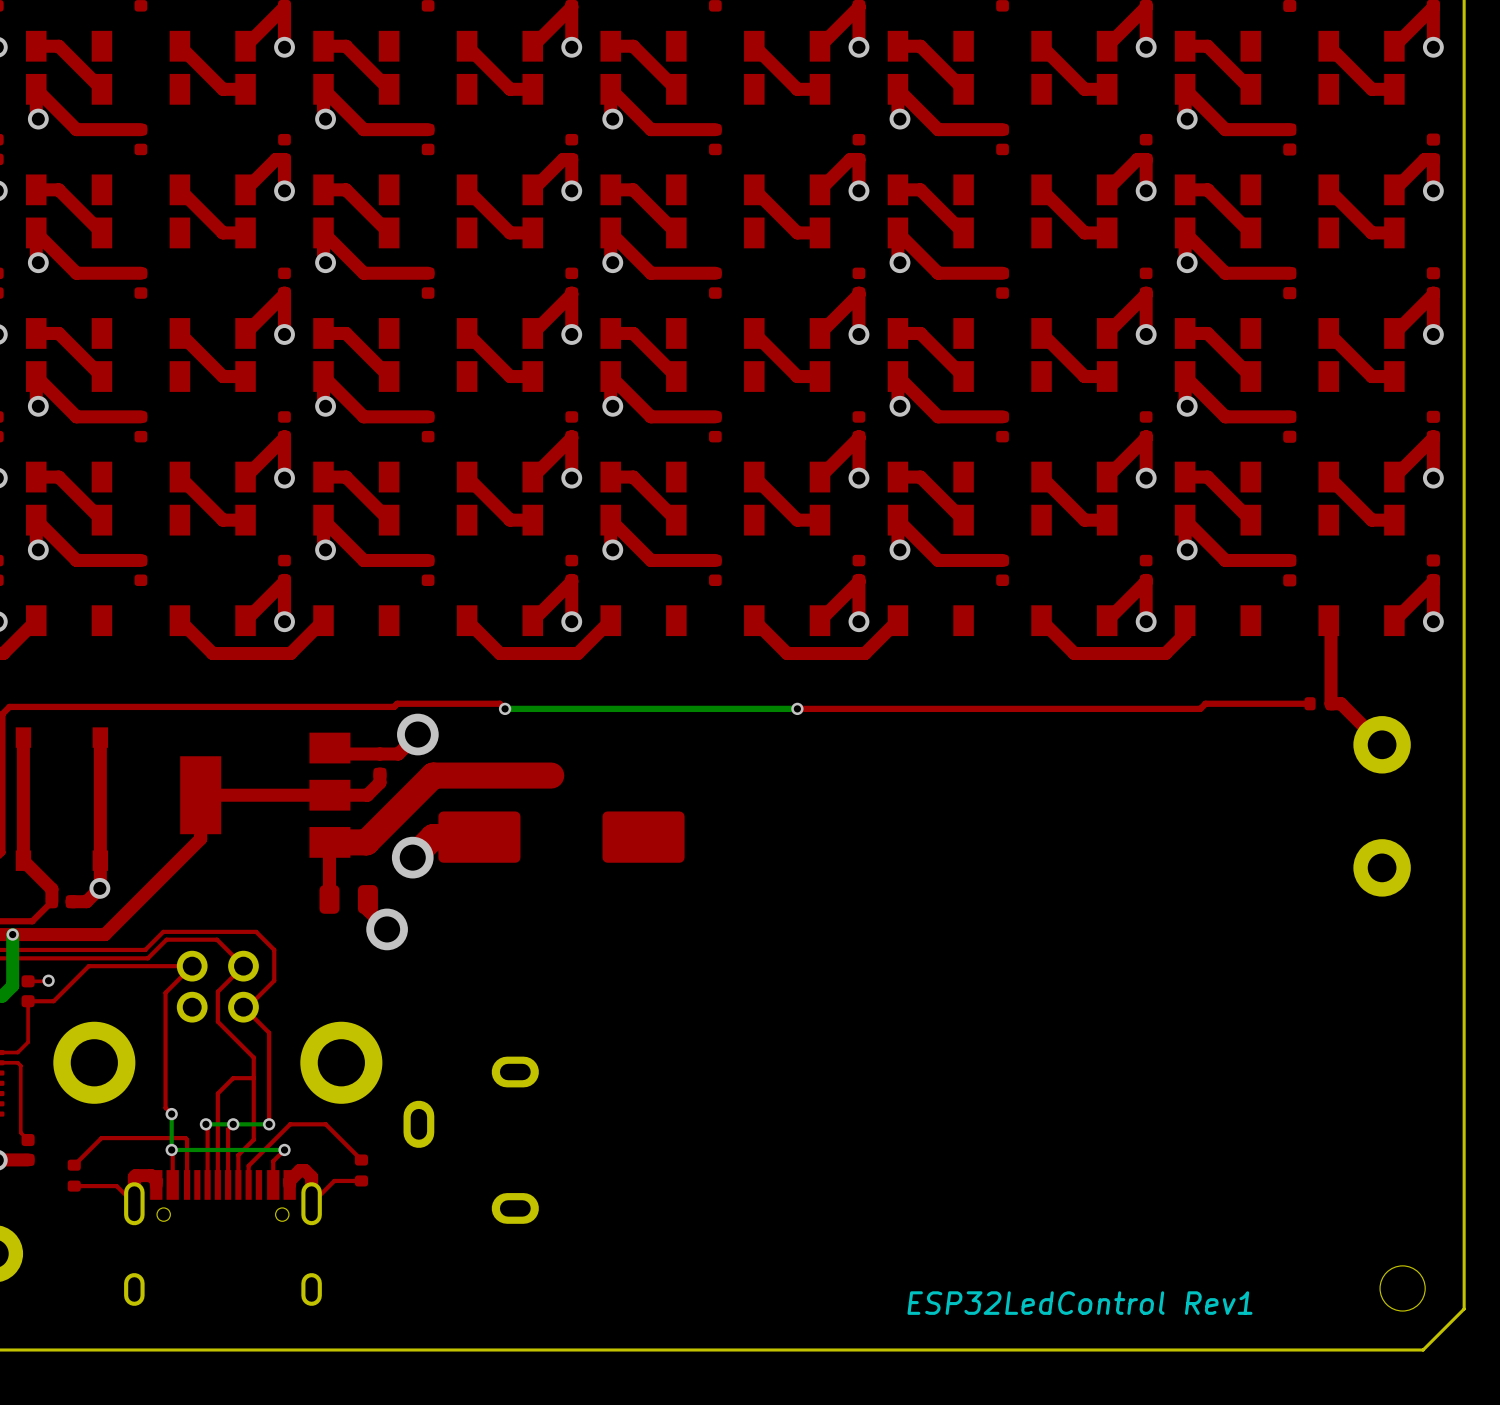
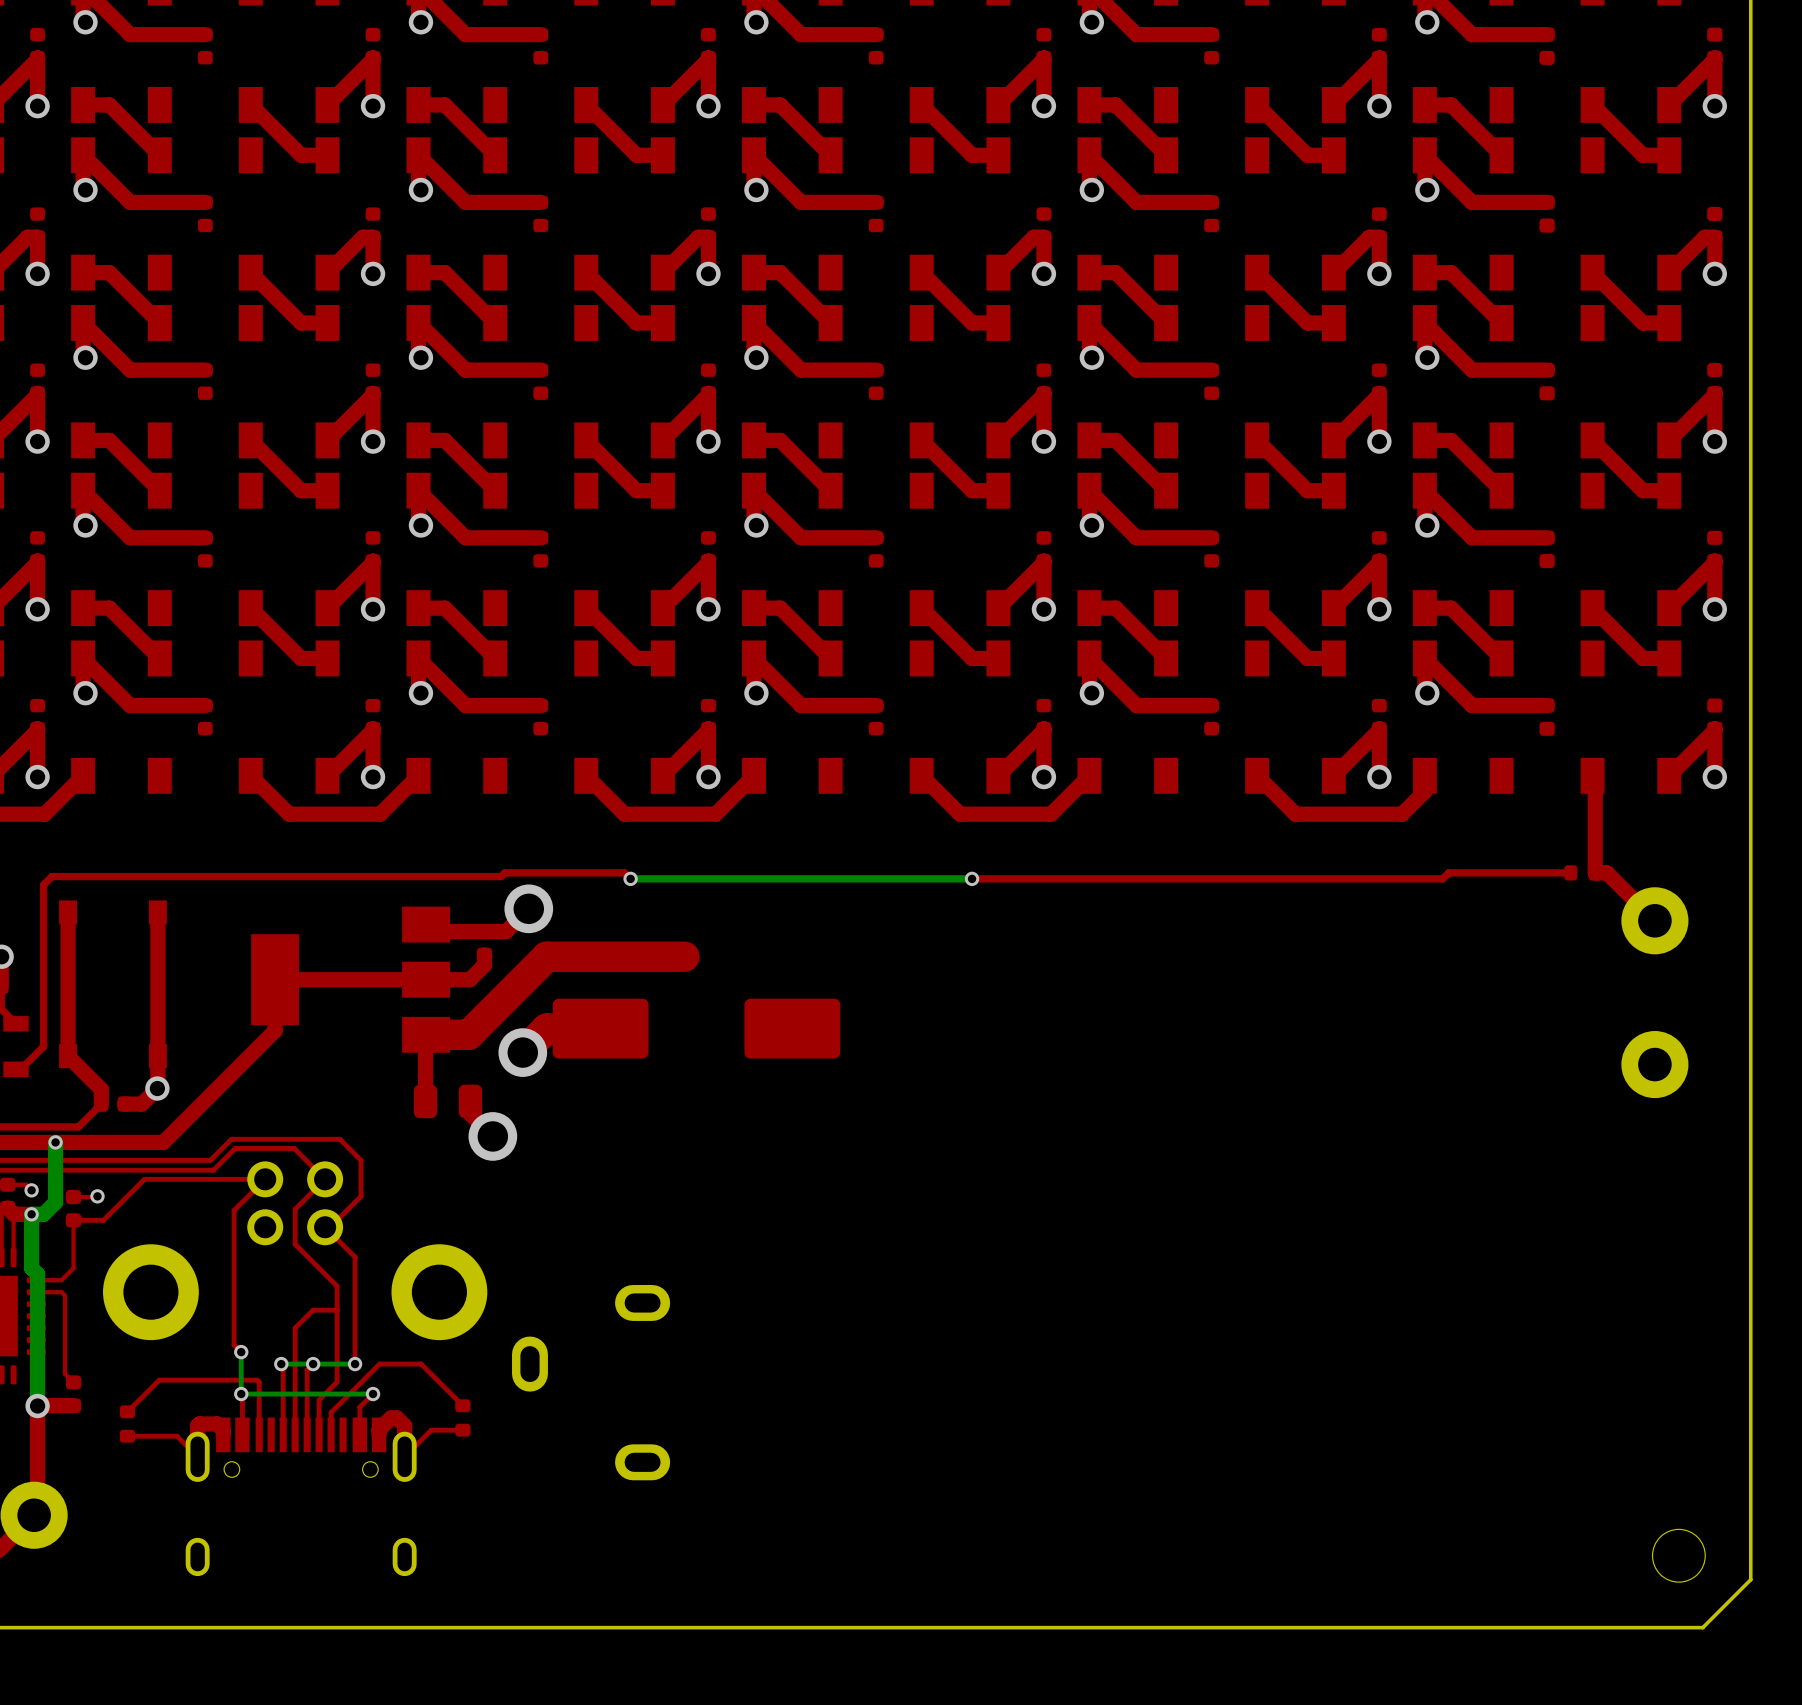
text: ESP32LedControl Rev1 (1079, 1303) -> none

